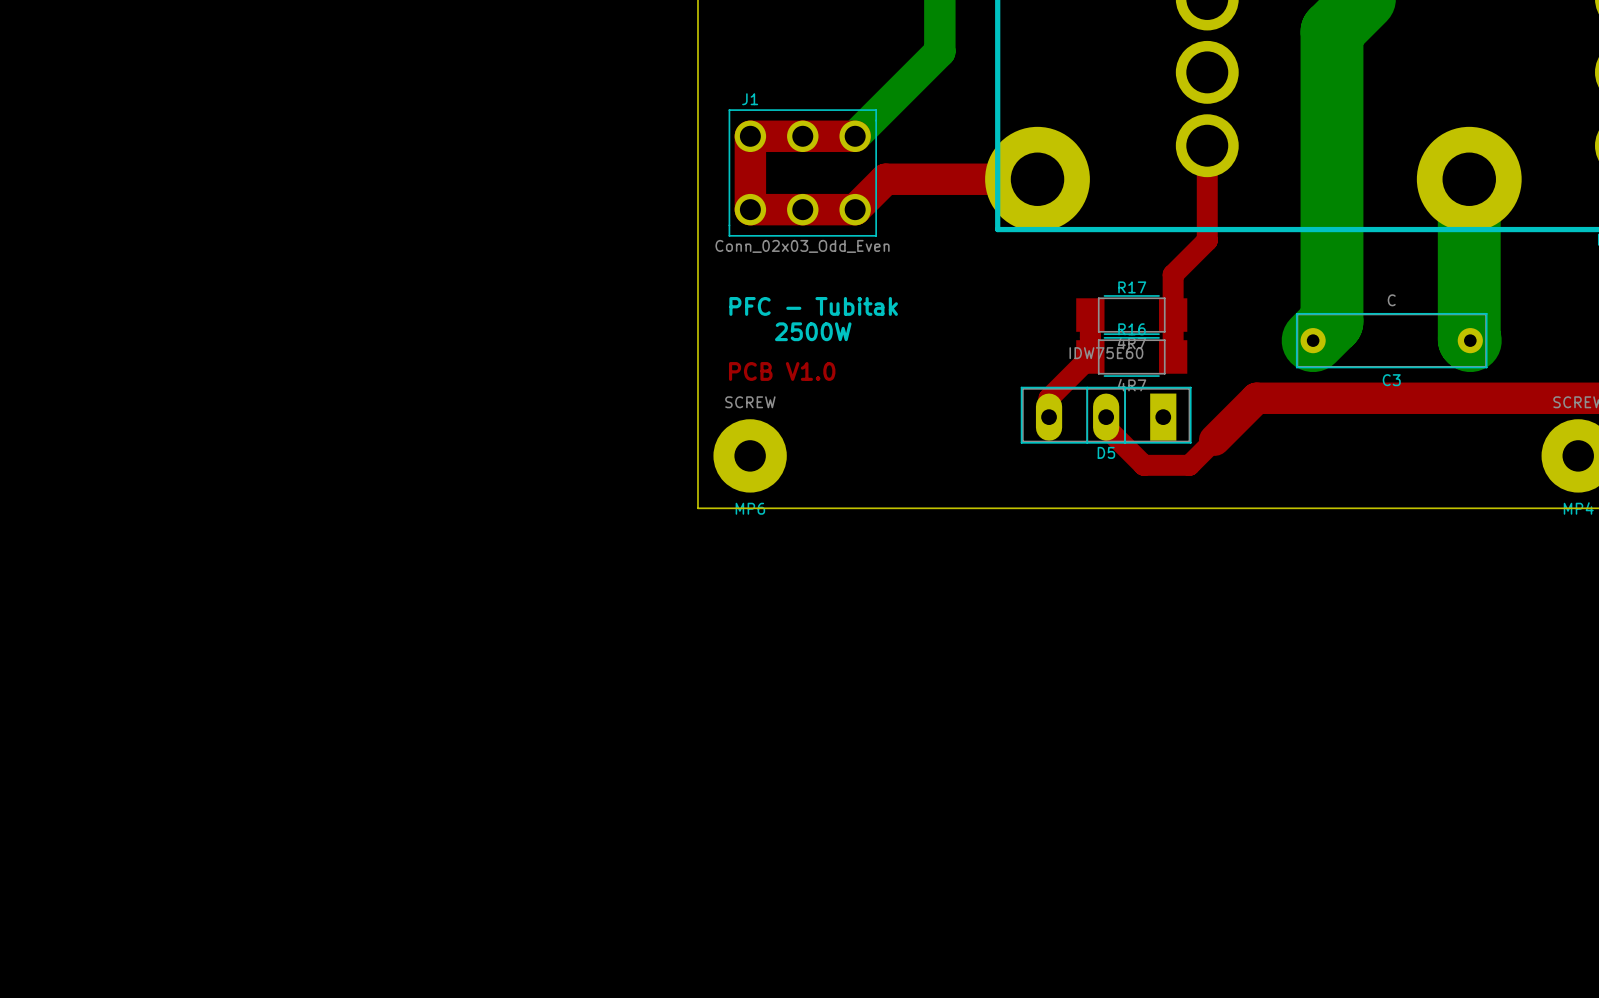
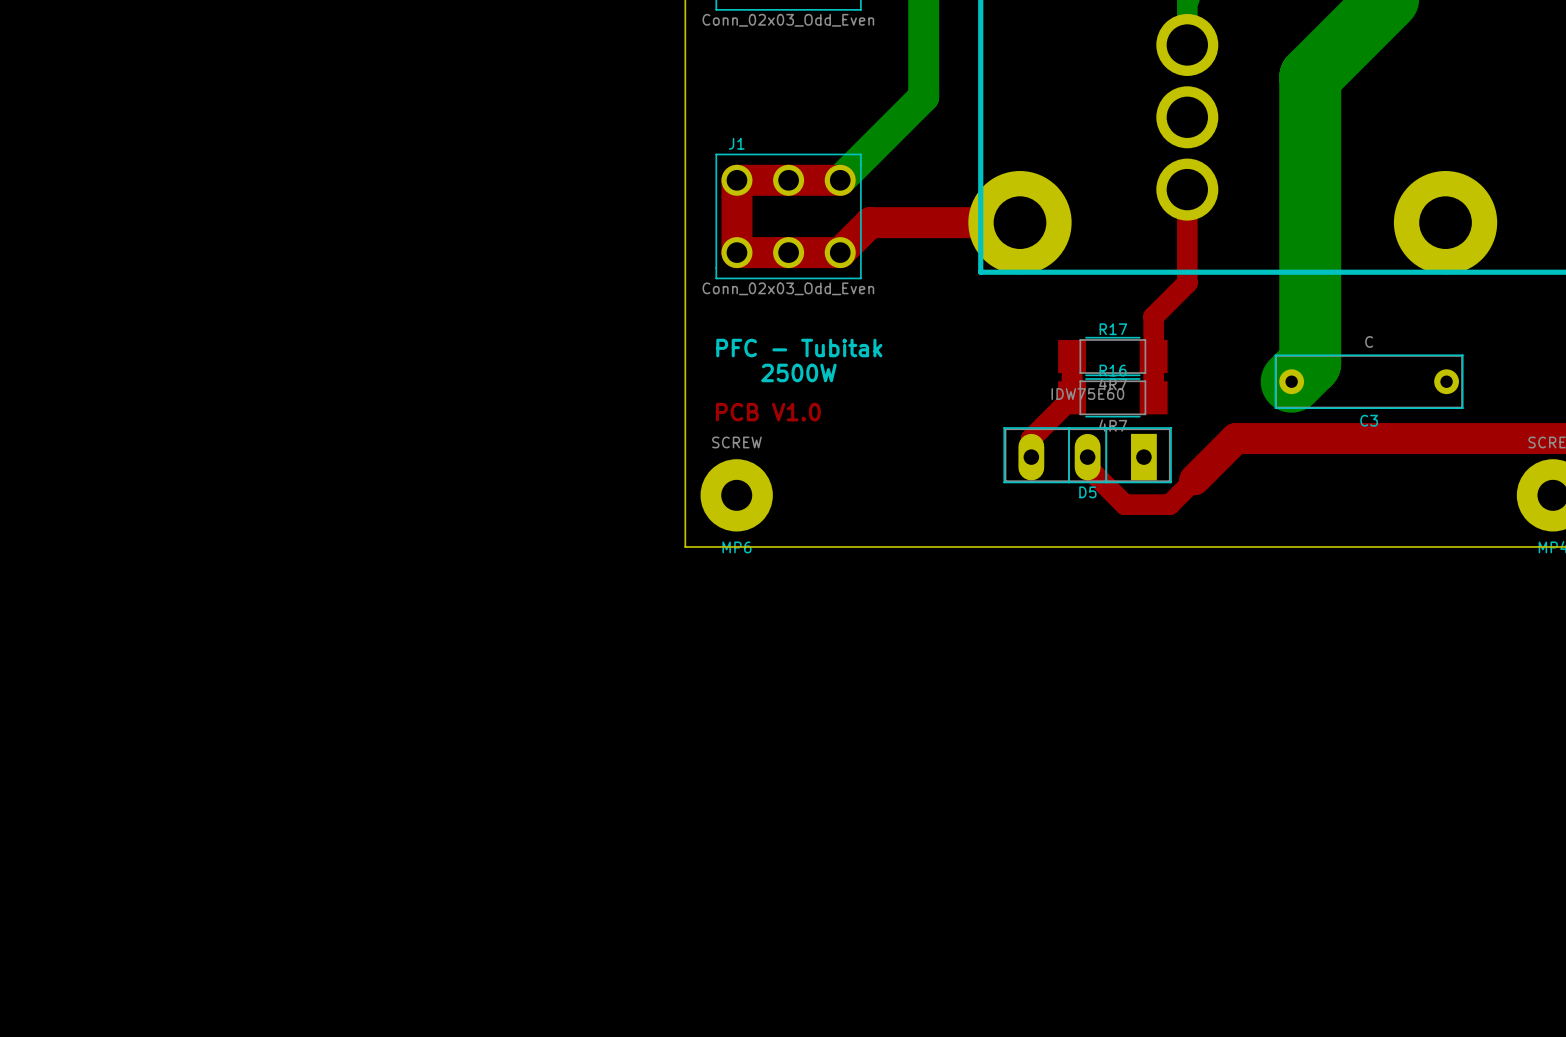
bottom track: (1469, 179) (1470, 340) -> none

